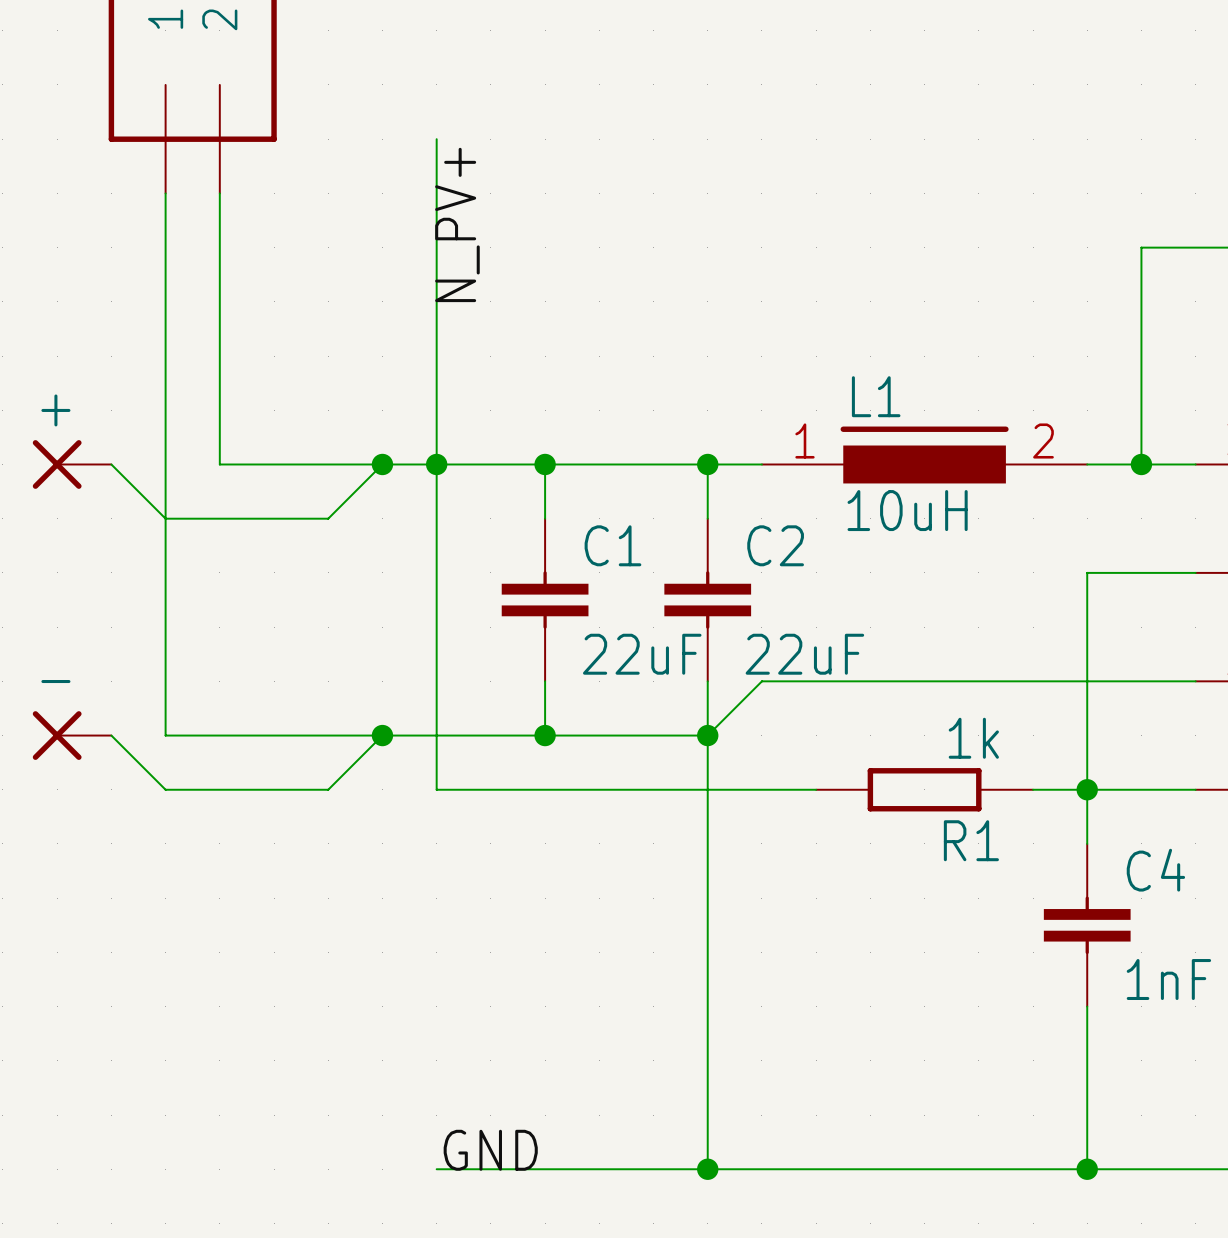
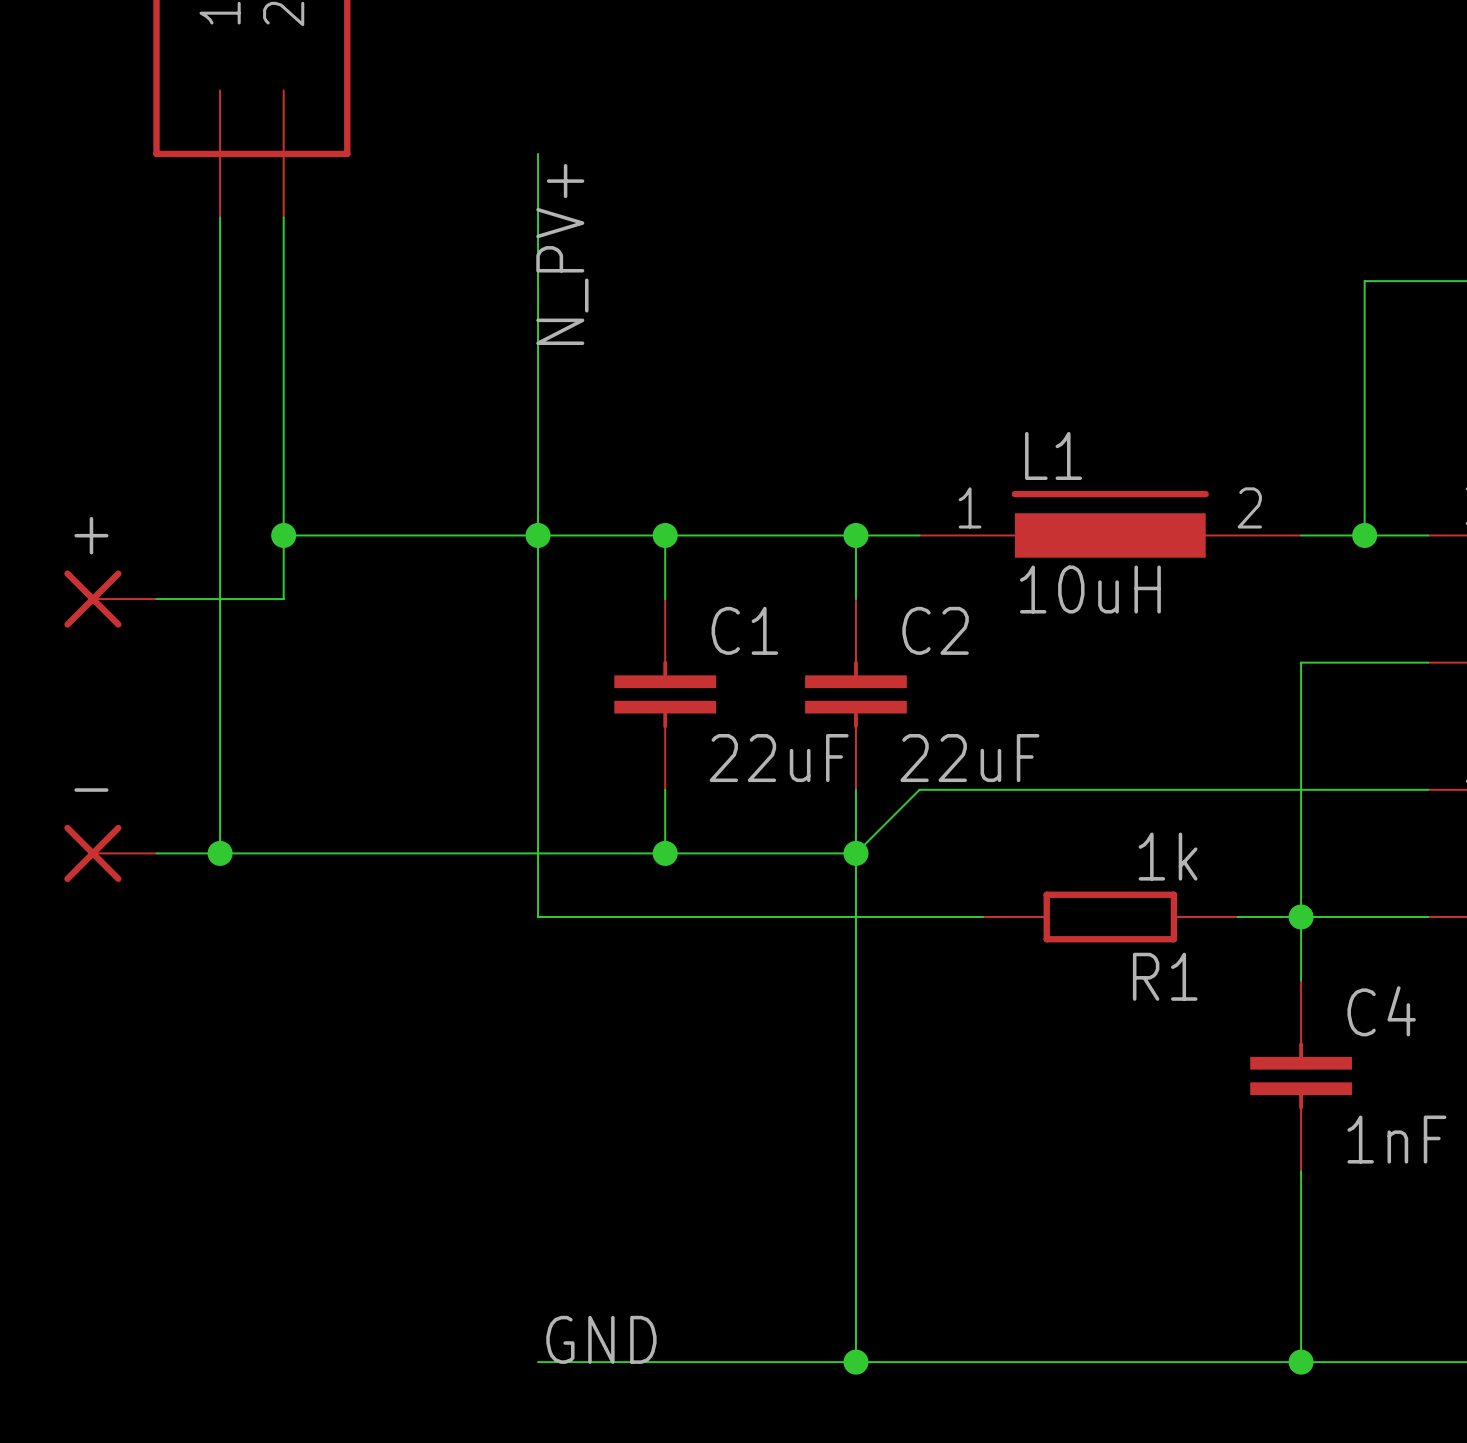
part position: (72, 464) -> (110, 599)
wire: (111, 464) (165, 518) -> (156, 599) (220, 599)
junction: none -> (283, 535)
wire: (382, 464) (328, 518) (219, 518) -> (283, 535) (283, 599)
junction: (382, 464) -> none
wire: (111, 735) (165, 789) (328, 789) (382, 735) -> (156, 853) (220, 853)
junction: none -> (220, 853)
junction: (382, 735) -> none

